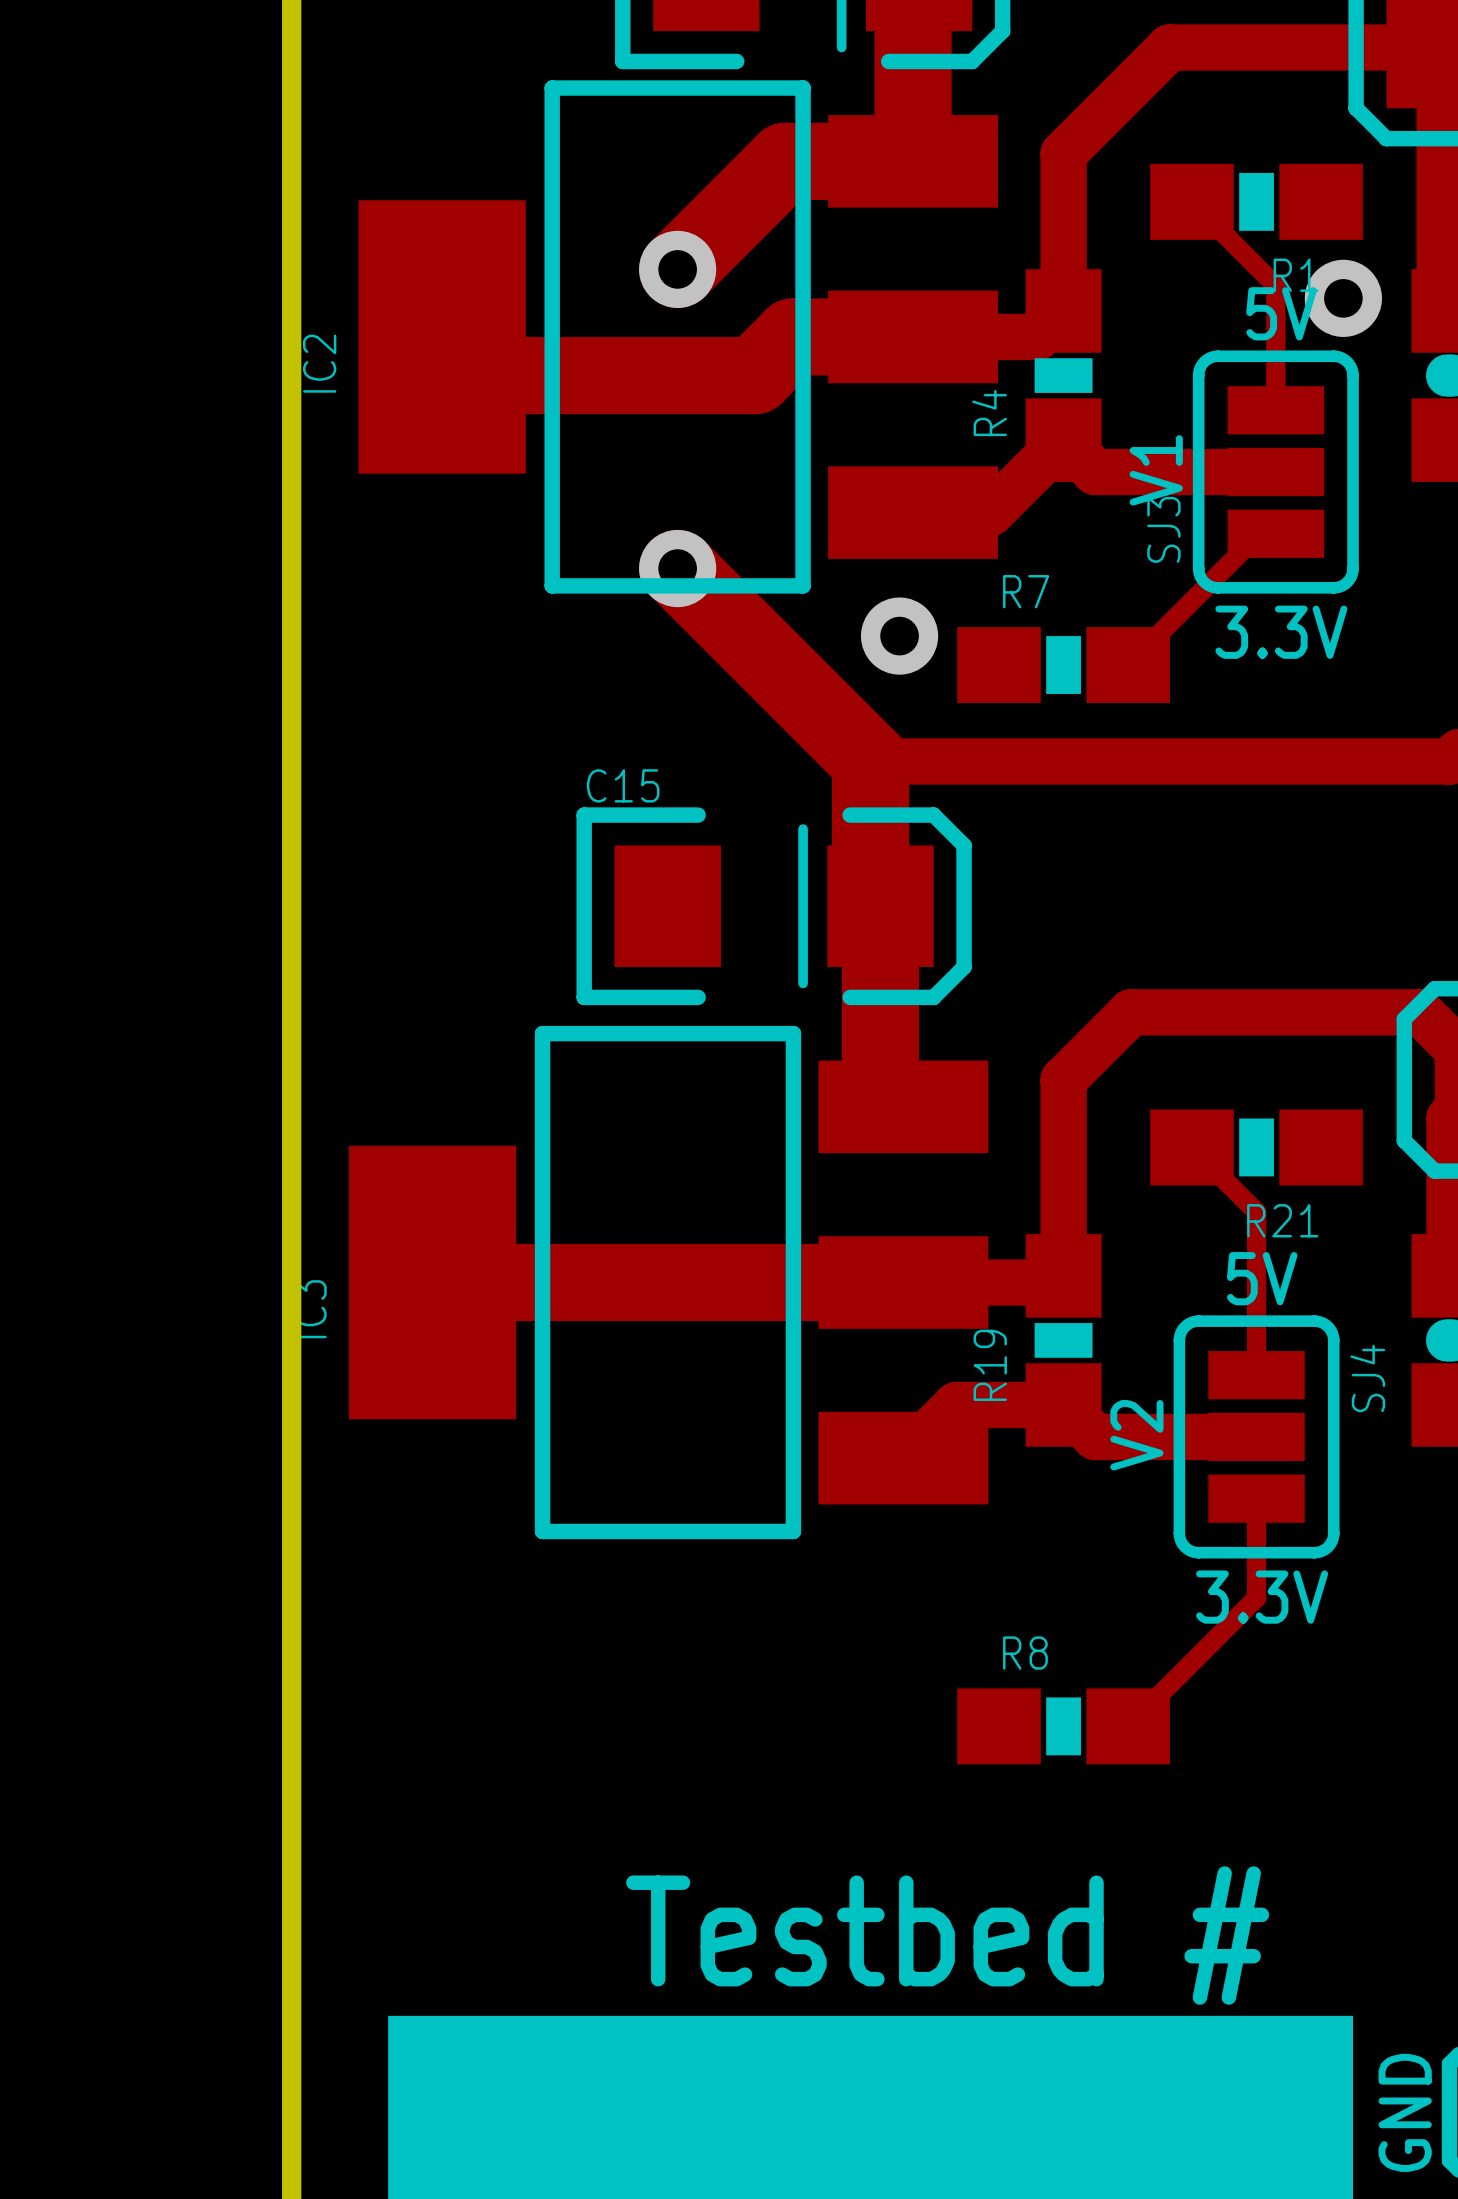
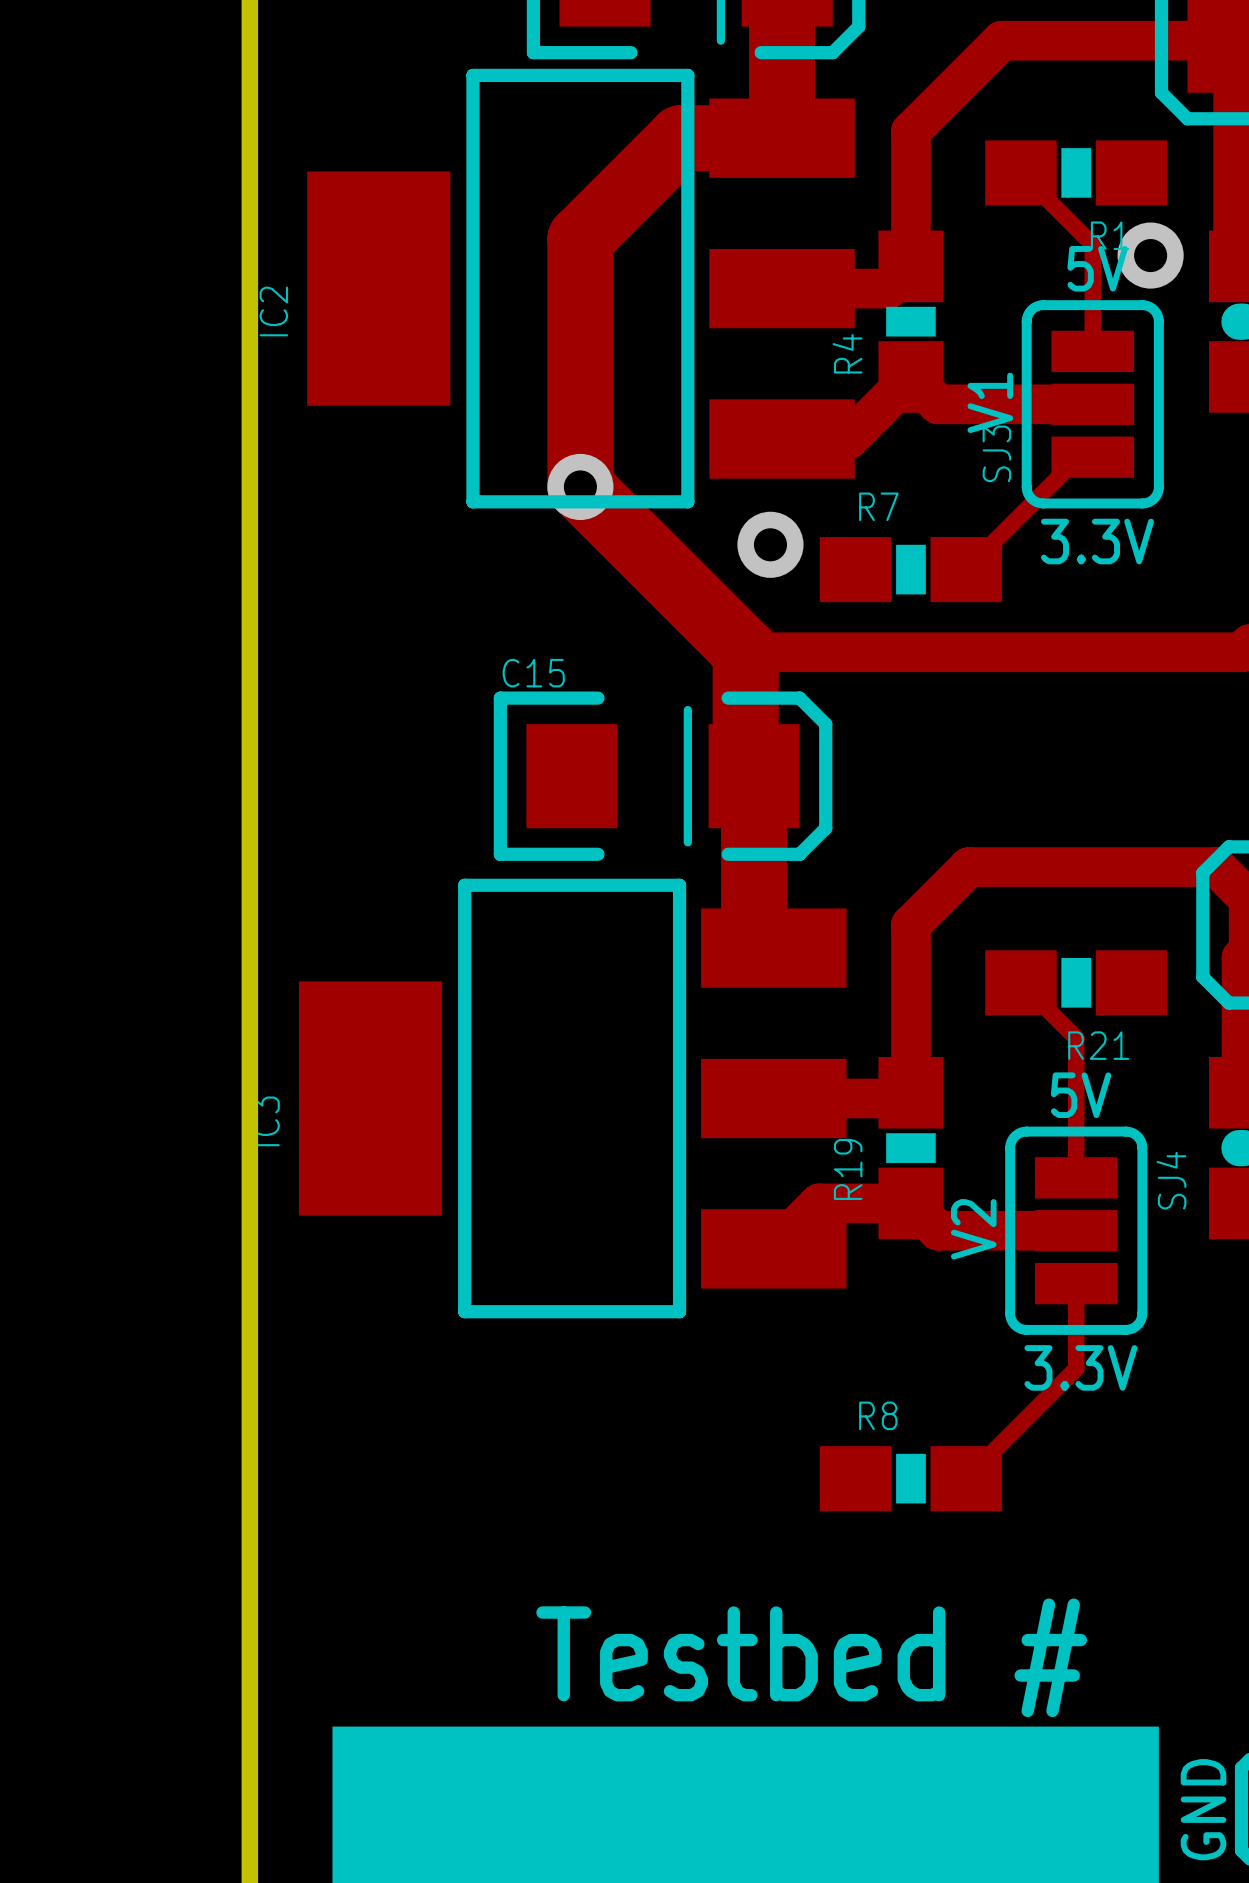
track: (795, 161) (785, 161) (677, 269) -> (681, 138) (580, 239) (580, 486)
via: (677, 269) -> none
track: (442, 336) (480, 375) (754, 375) (793, 336) (913, 336) -> none
track: (432, 1282) (903, 1282) -> none

